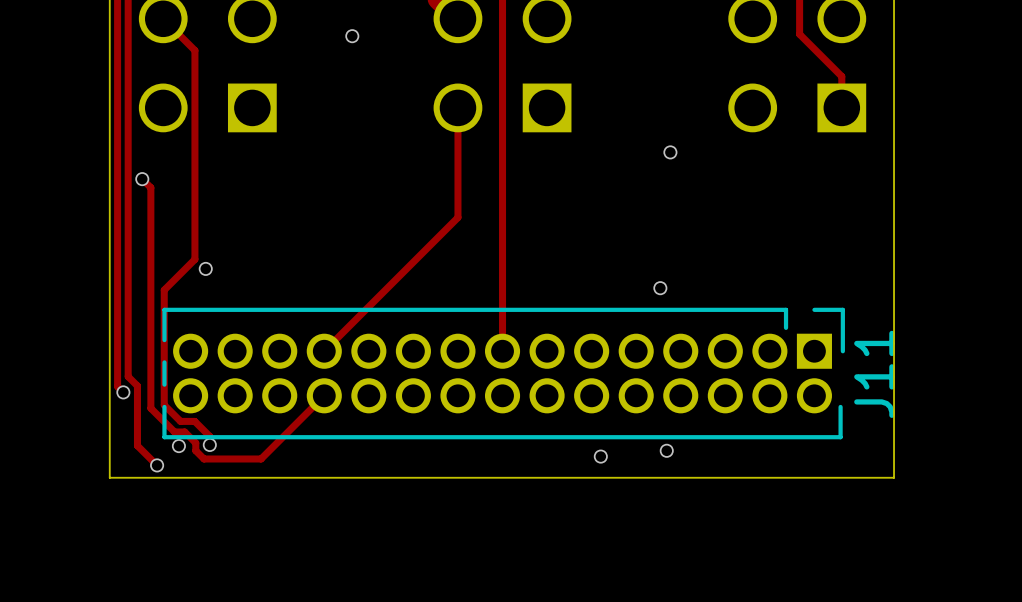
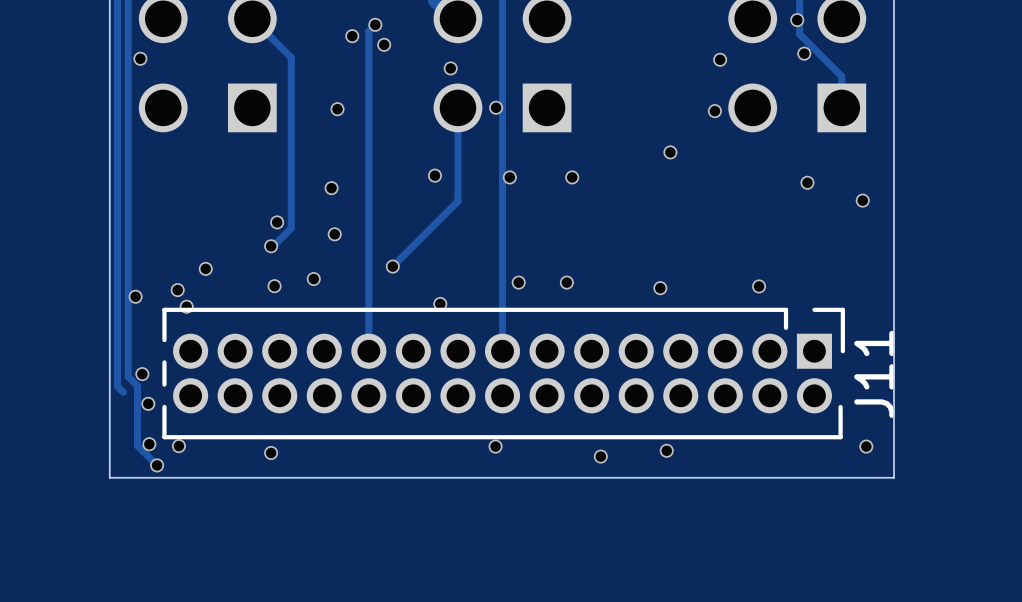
track: (163, 18) (194, 50) (194, 259) (164, 290) (164, 405) (180, 421) (194, 421) (209, 436) (209, 444) -> none
track: none -> (252, 18) (291, 57) (291, 228) (271, 246)
via: none -> (797, 20)
track: none -> (375, 24) (368, 31) (368, 351)
via: none -> (375, 24)
via: none -> (384, 44)
via: none -> (804, 53)
via: none -> (140, 58)
via: none -> (720, 59)
via: none -> (450, 68)
via: none -> (496, 107)
via: none -> (337, 109)
via: none -> (714, 111)
via: none -> (434, 175)
via: none -> (509, 177)
via: none -> (572, 177)
track: (142, 179) (150, 187) (150, 408) (174, 432) (184, 432) (195, 443) (195, 450) (204, 458) (261, 458) (324, 395) -> none
via: (142, 179) -> none
via: none -> (807, 182)
via: none -> (331, 188)
via: none -> (862, 200)
track: (457, 201) (457, 217) (324, 351) -> (457, 201) (392, 266)
via: none -> (277, 222)
via: none -> (334, 234)
via: none -> (271, 246)
via: none -> (392, 266)
via: none -> (313, 279)
via: none -> (518, 282)
via: none -> (566, 282)
via: none -> (274, 286)
via: none -> (759, 286)
via: none -> (177, 290)
via: none -> (135, 296)
via: none -> (440, 303)
via: none -> (186, 306)
via: none -> (142, 374)
via: (123, 392) -> none
via: none -> (148, 403)
via: none -> (149, 444)
via: (209, 444) -> none
via: none -> (495, 446)
via: none -> (866, 446)
via: none -> (271, 453)

